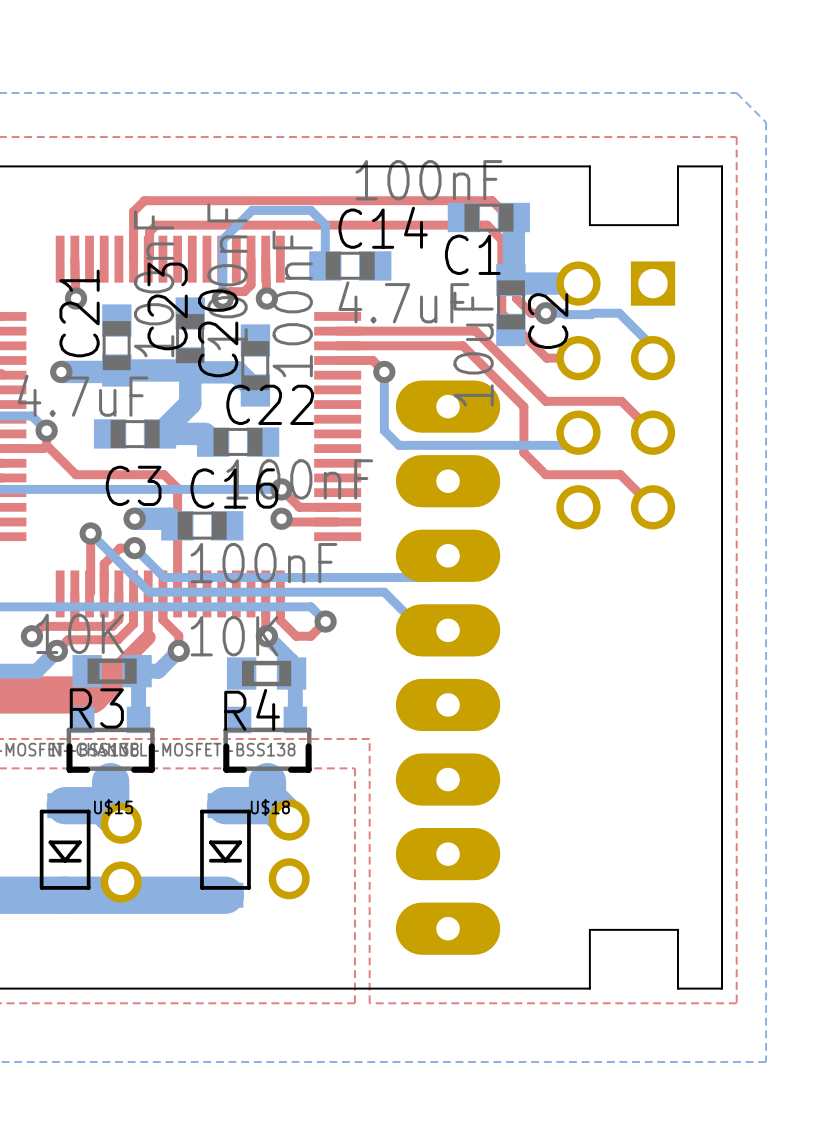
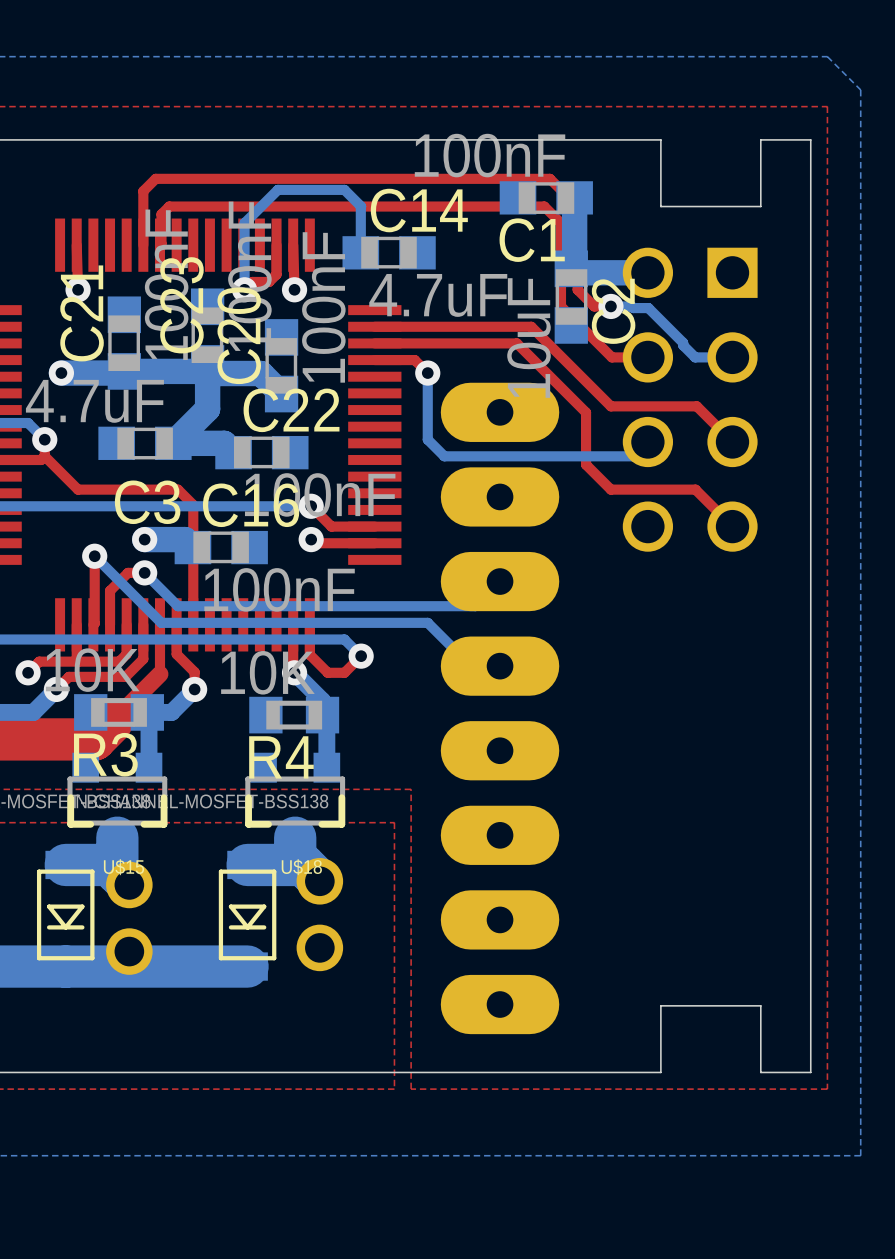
bottom track: (578, 314) (619, 313) (653, 346) (653, 358) -> (648, 308) (695, 357) (732, 357)

